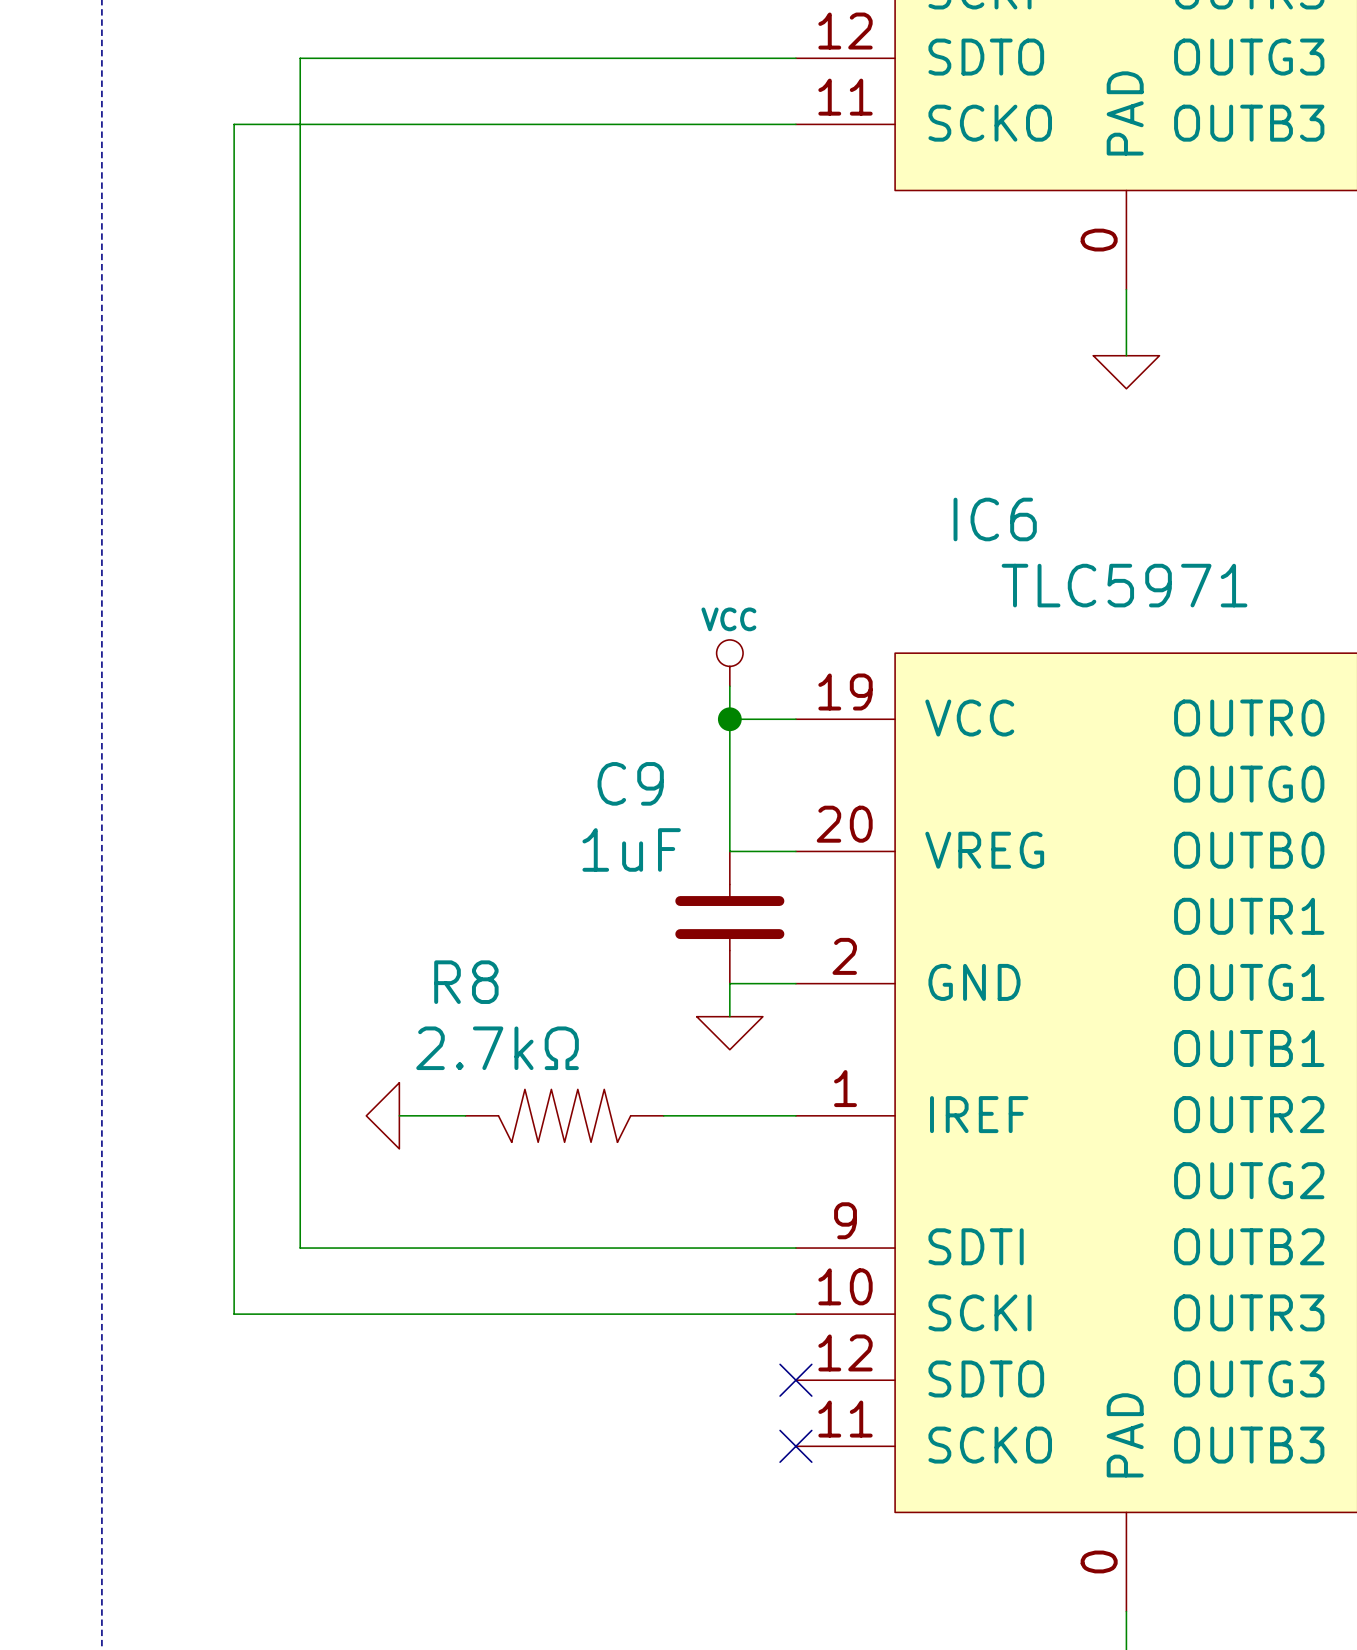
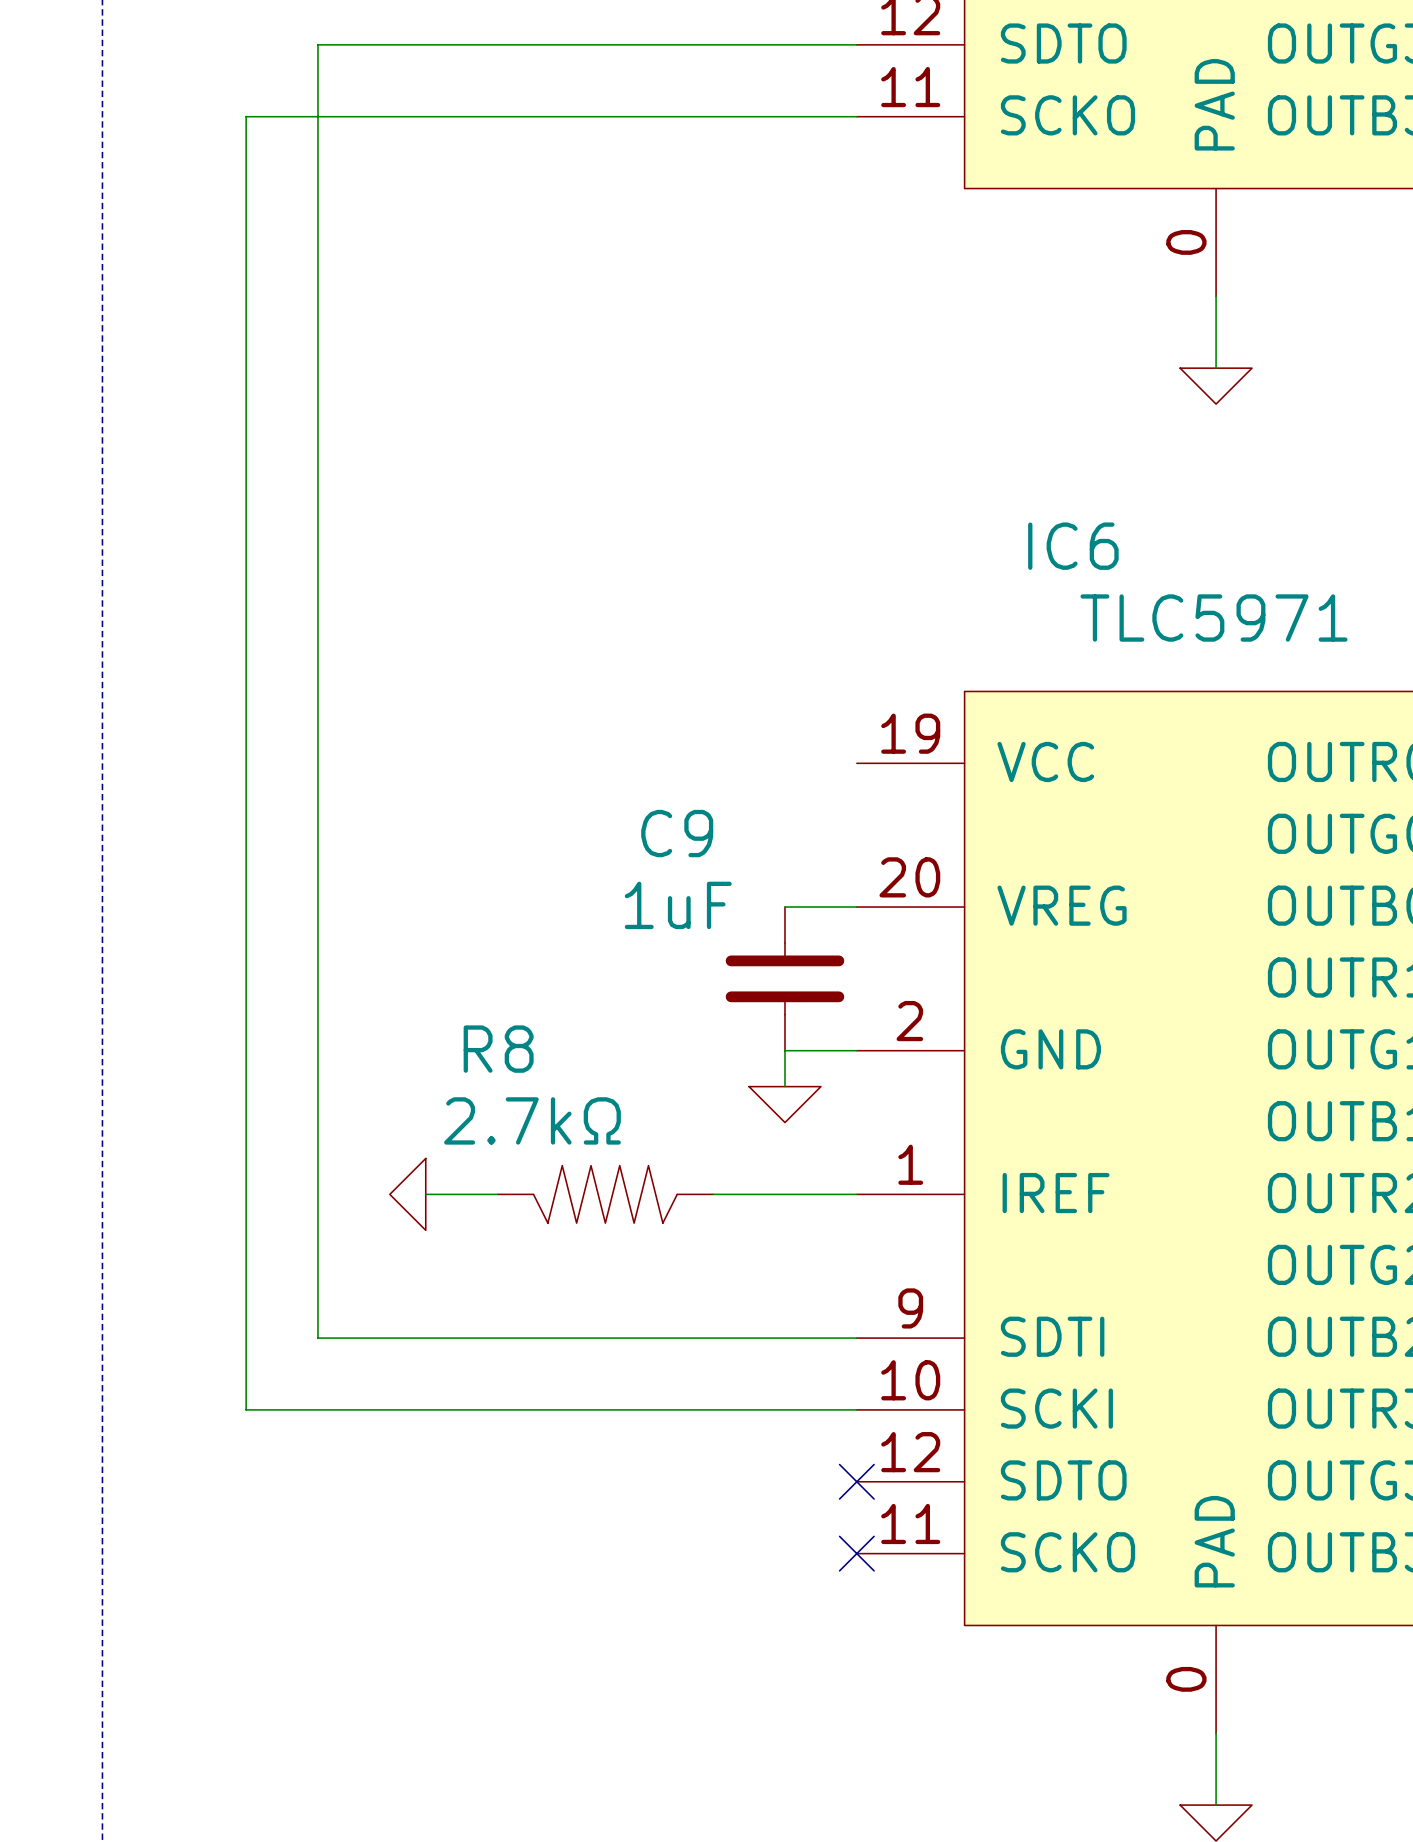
power symbol: VCC (729, 663) -> none
wire: (729, 686) (729, 851) -> none
wire: (729, 719) (795, 719) -> none
junction: (729, 719) -> none

